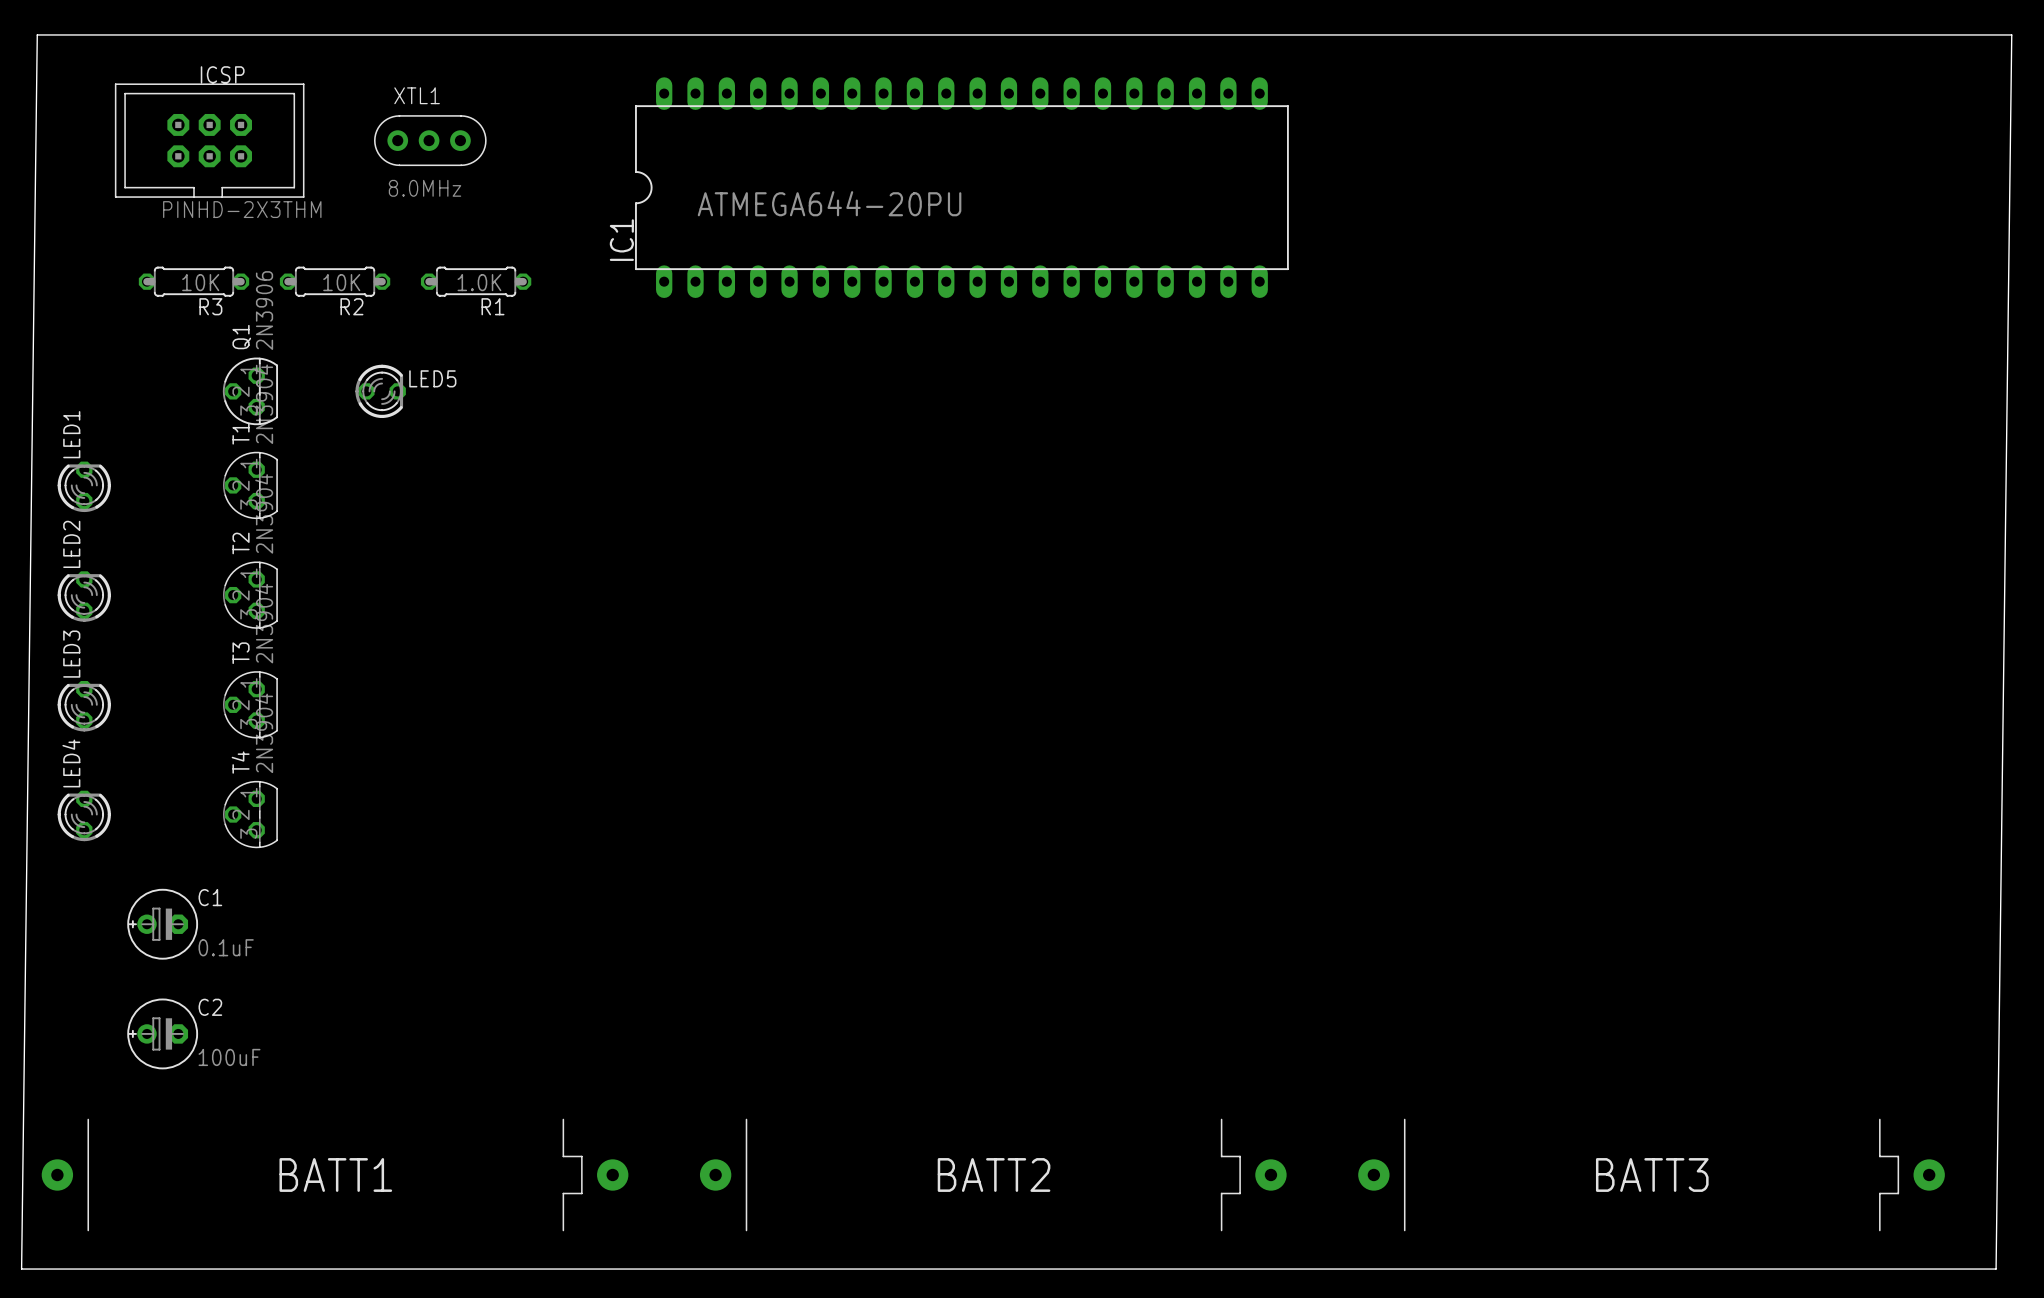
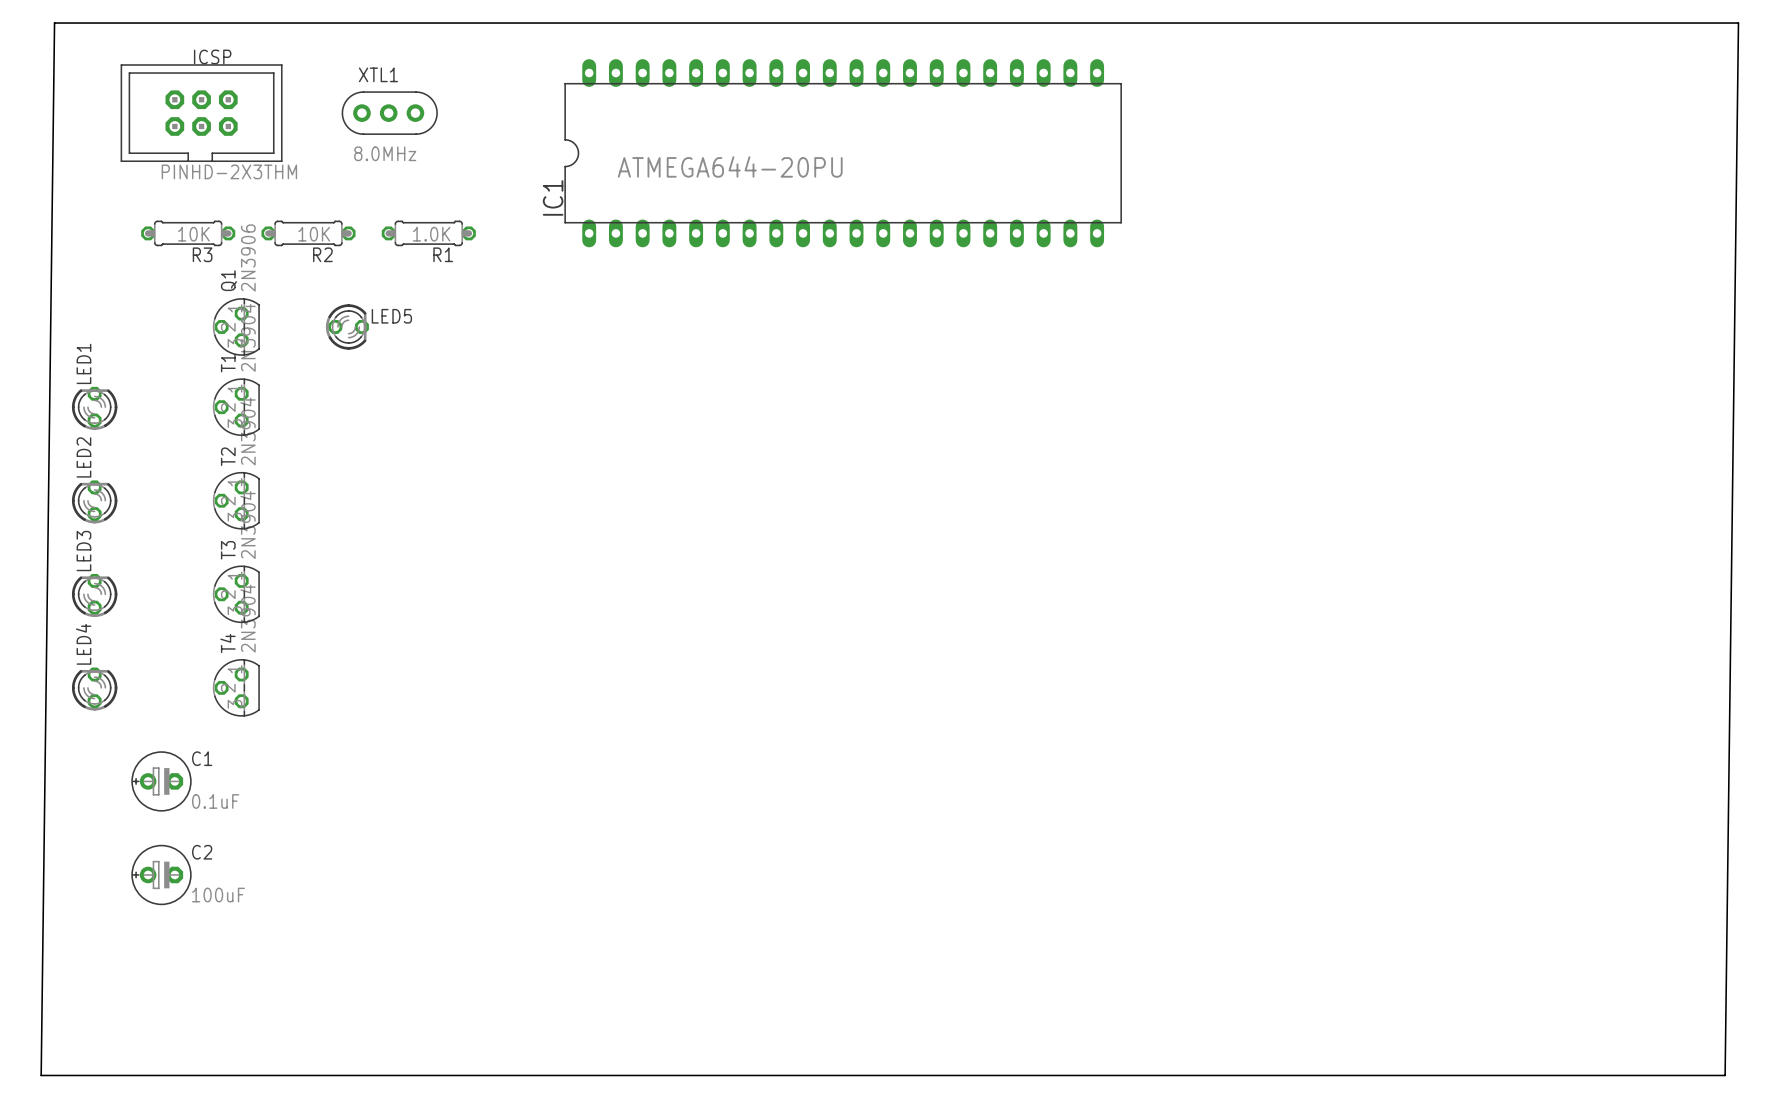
BATT1: (335, 1174) -> none
BATT2: (993, 1174) -> none
BATT3: (1651, 1174) -> none

